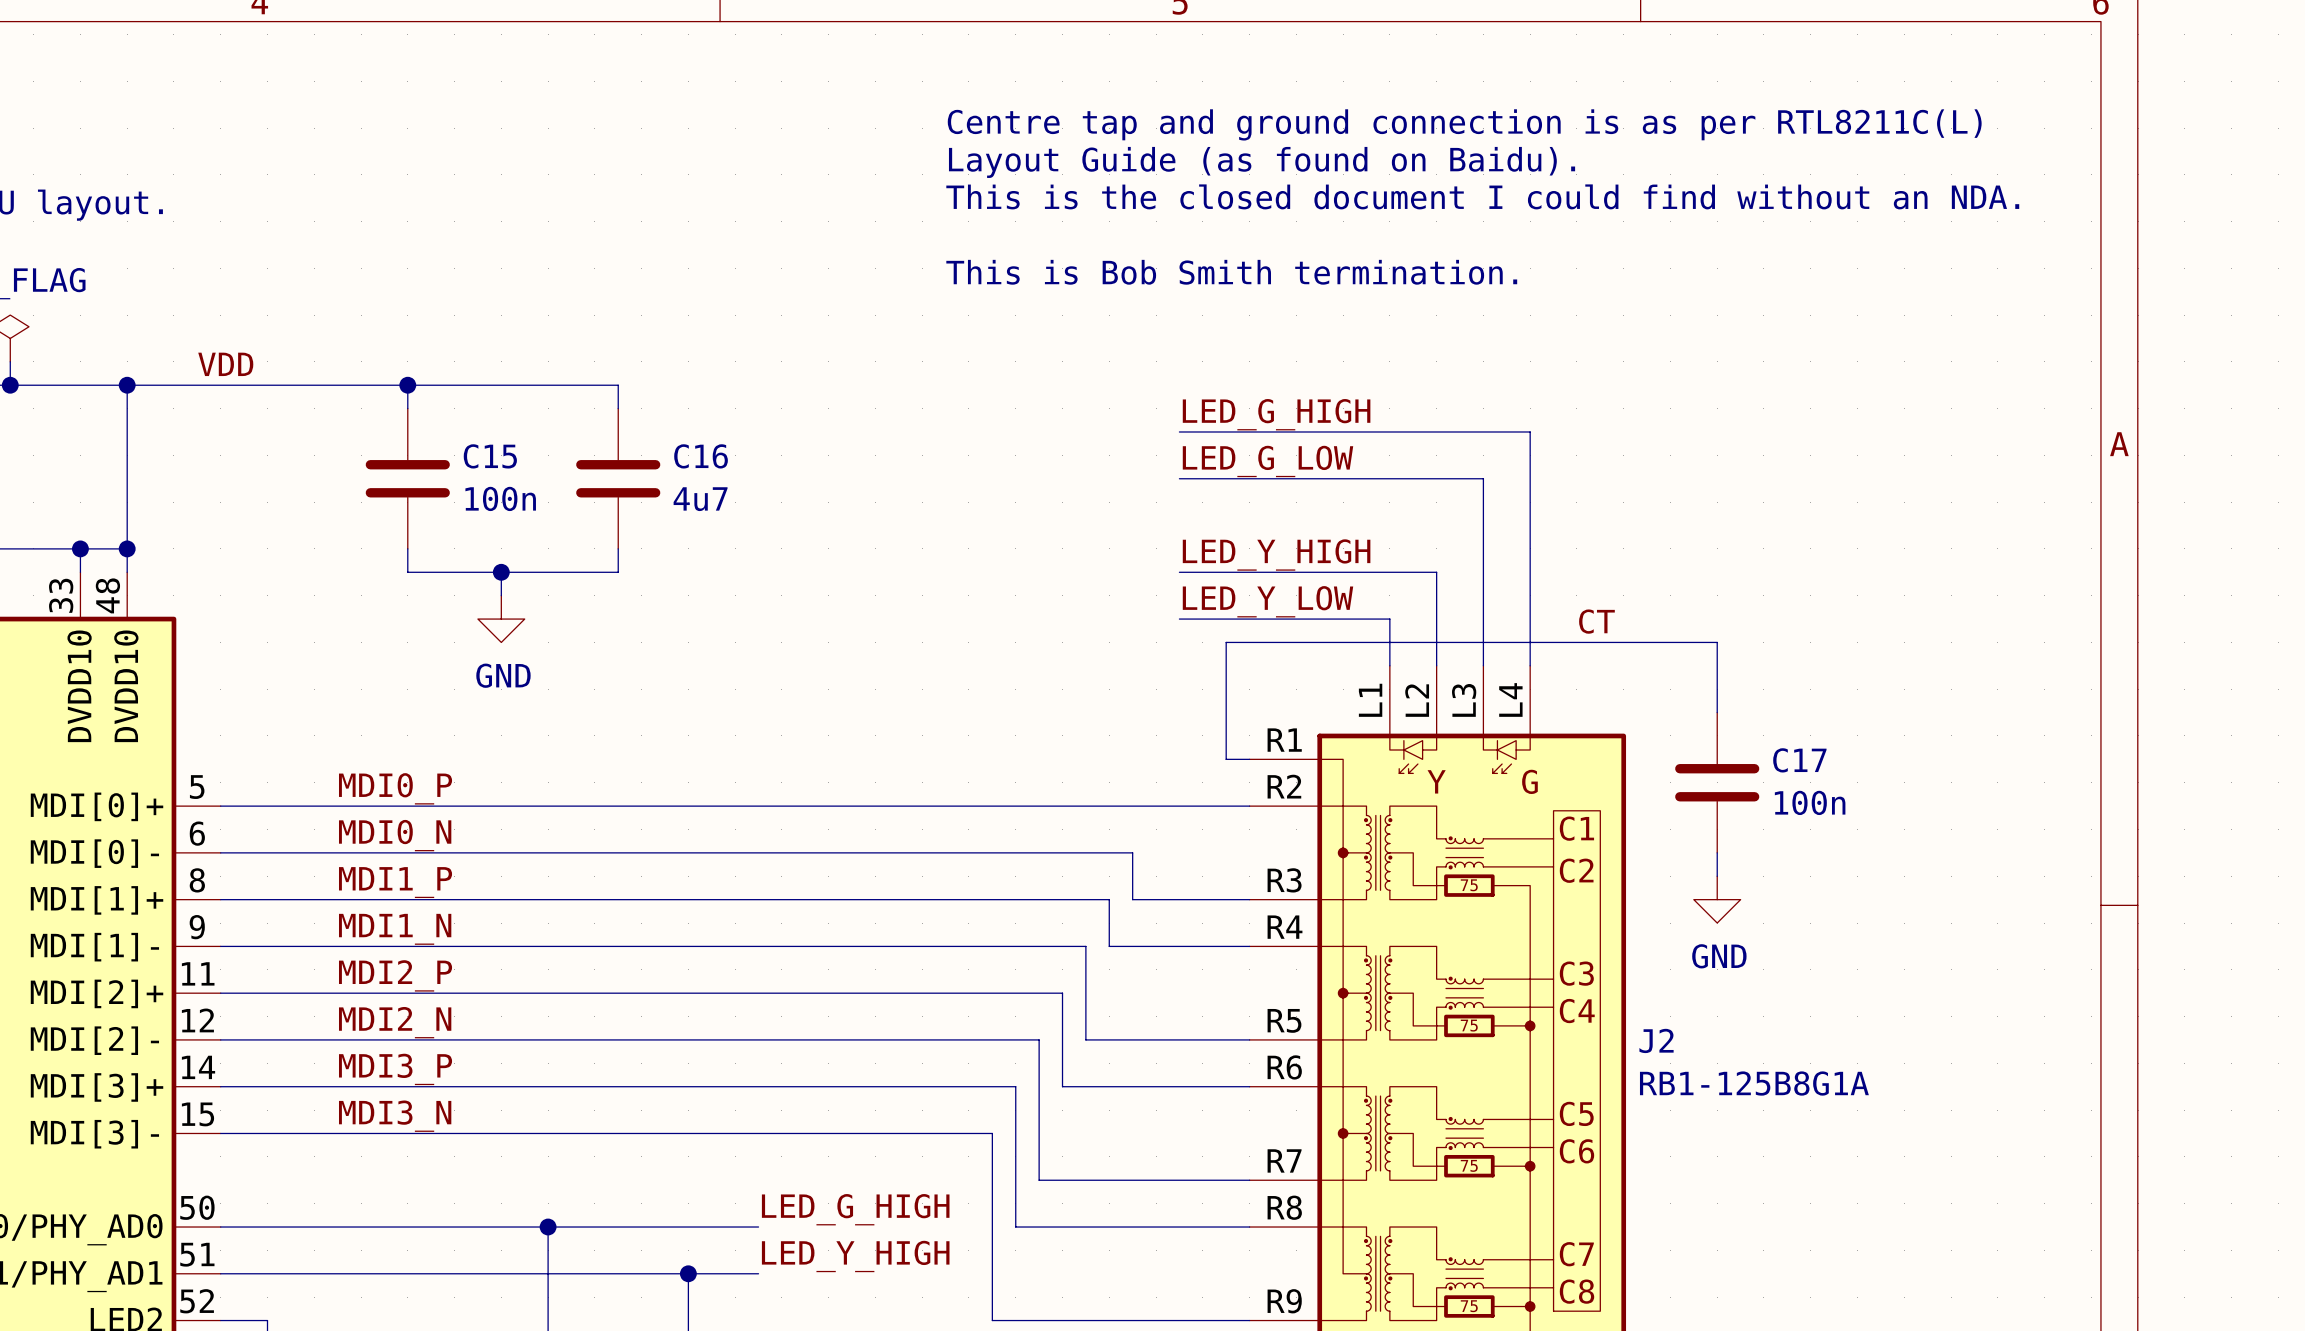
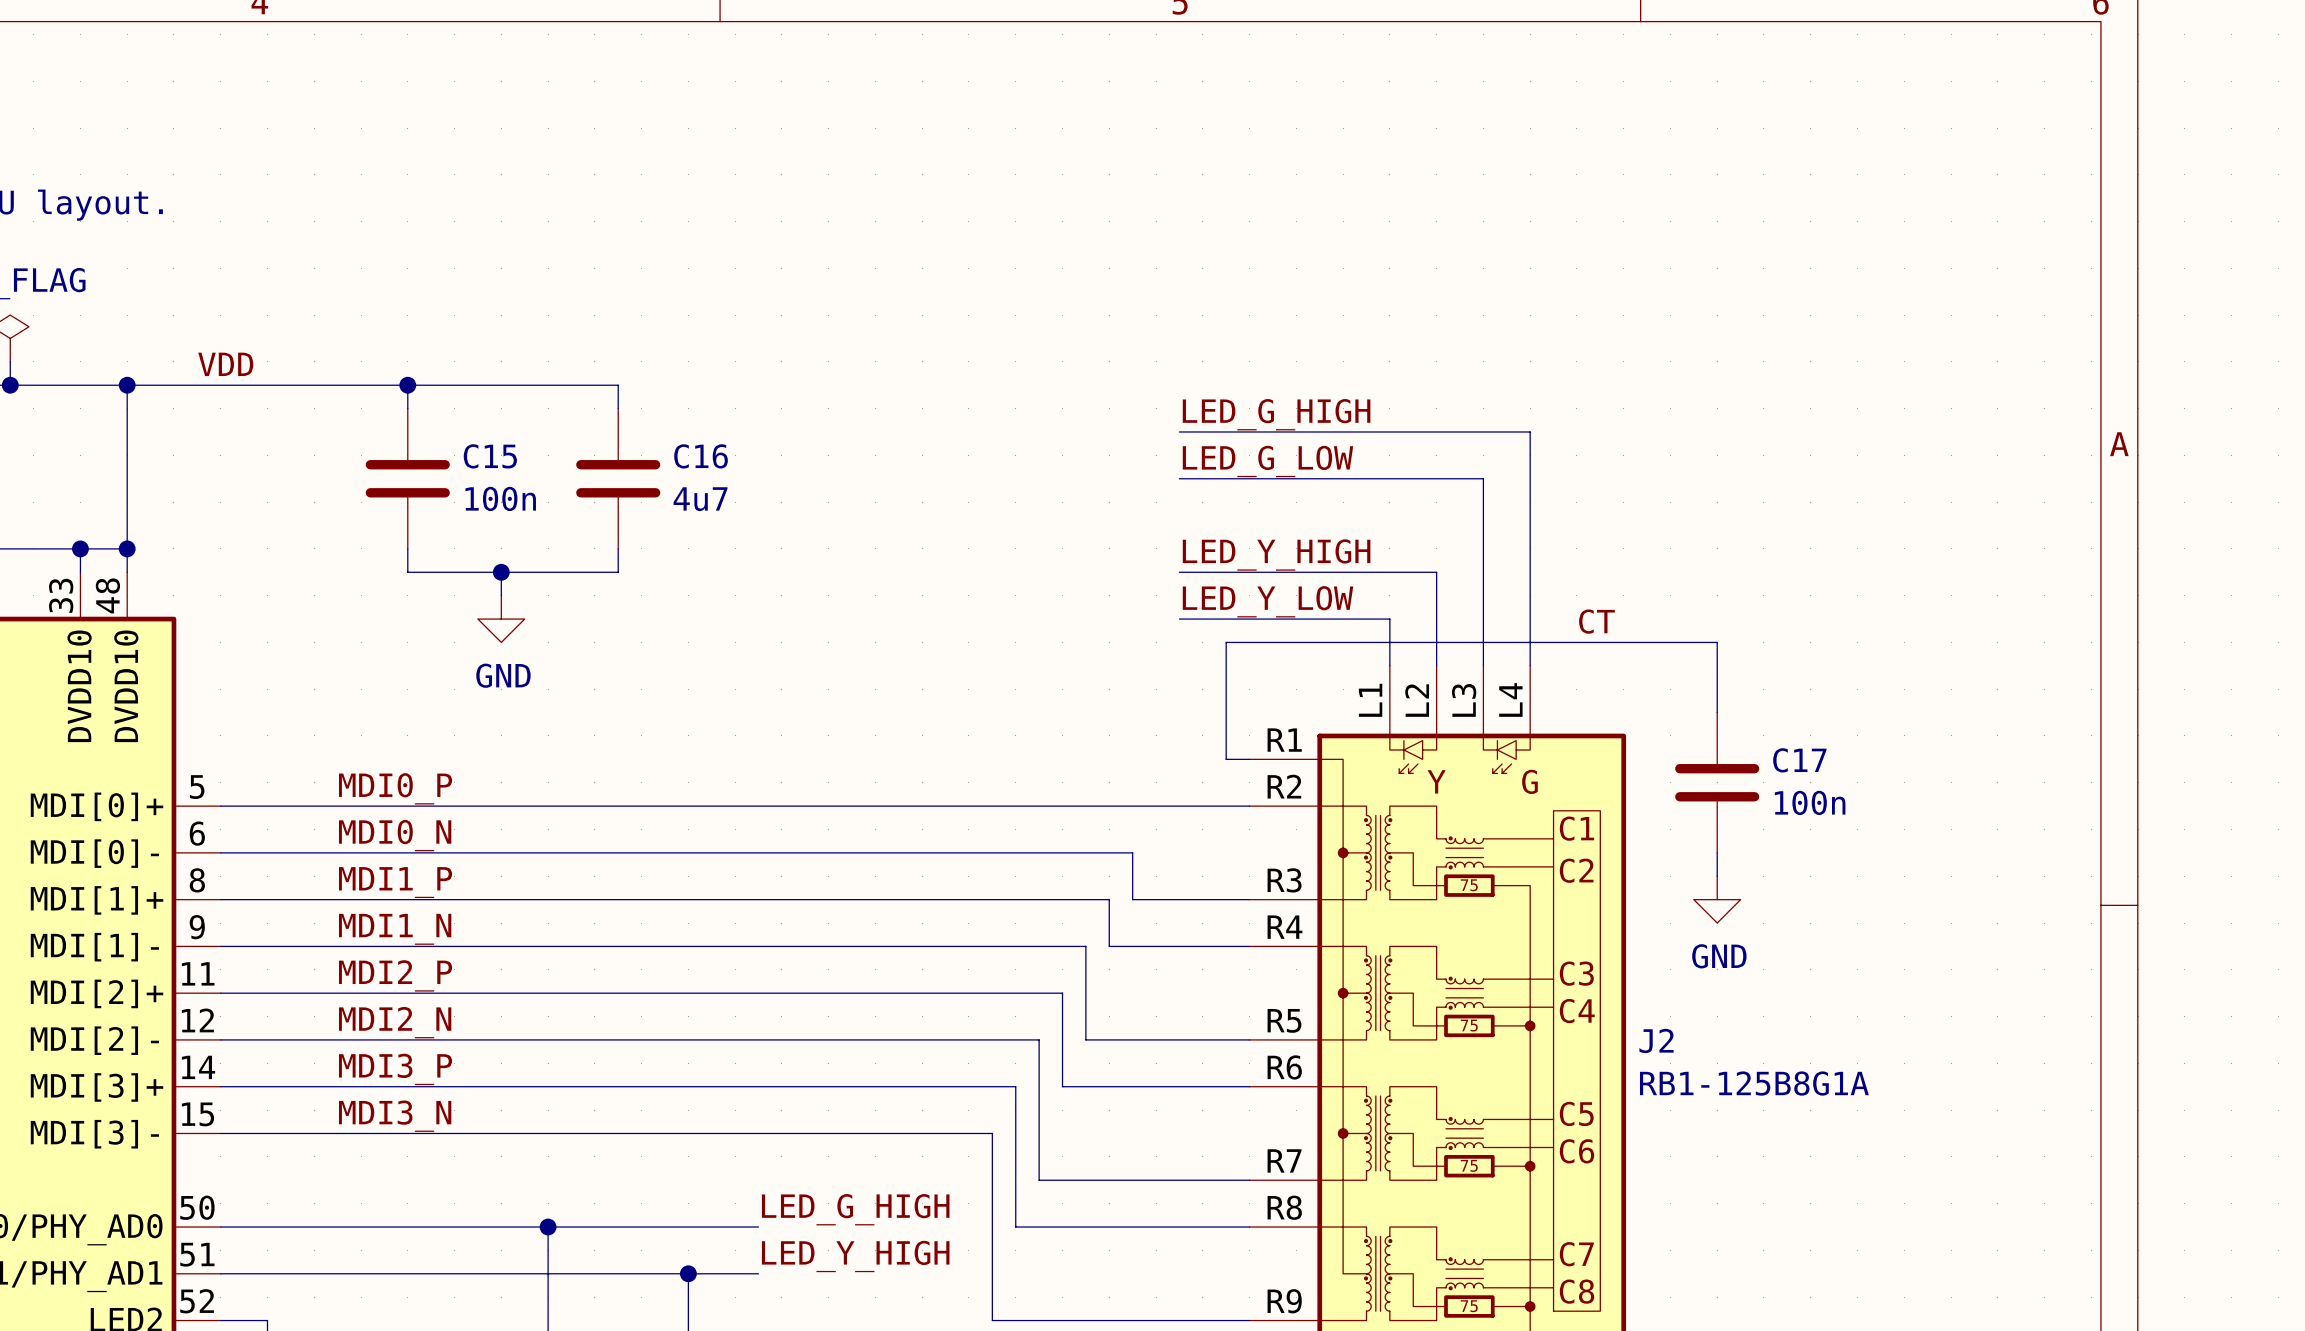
text: Centre tap and ground connection is as per RTL8211C(L) (1464, 124) -> none
text: Layout Guide (as found on Baidu). (1262, 162) -> none
text: This is the closed document I could find without an NDA. (1482, 196) -> none
text: This is Bob Smith termination. (1231, 272) -> none

